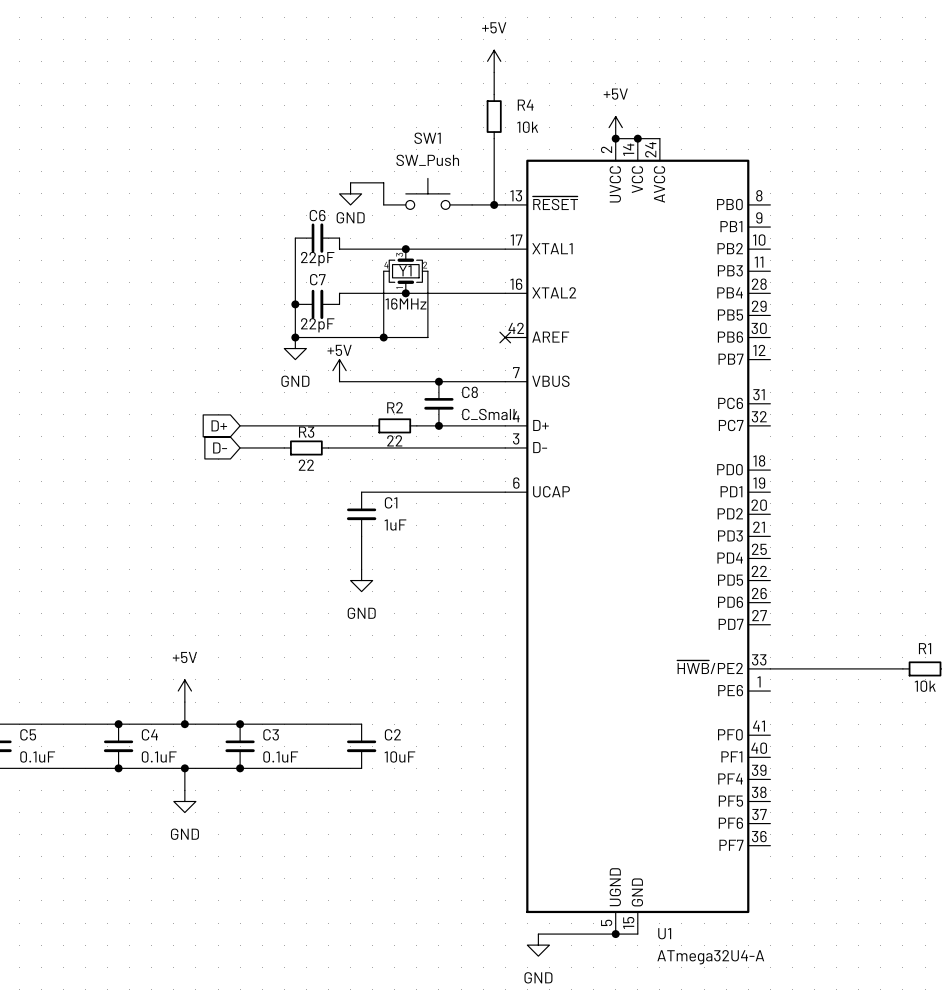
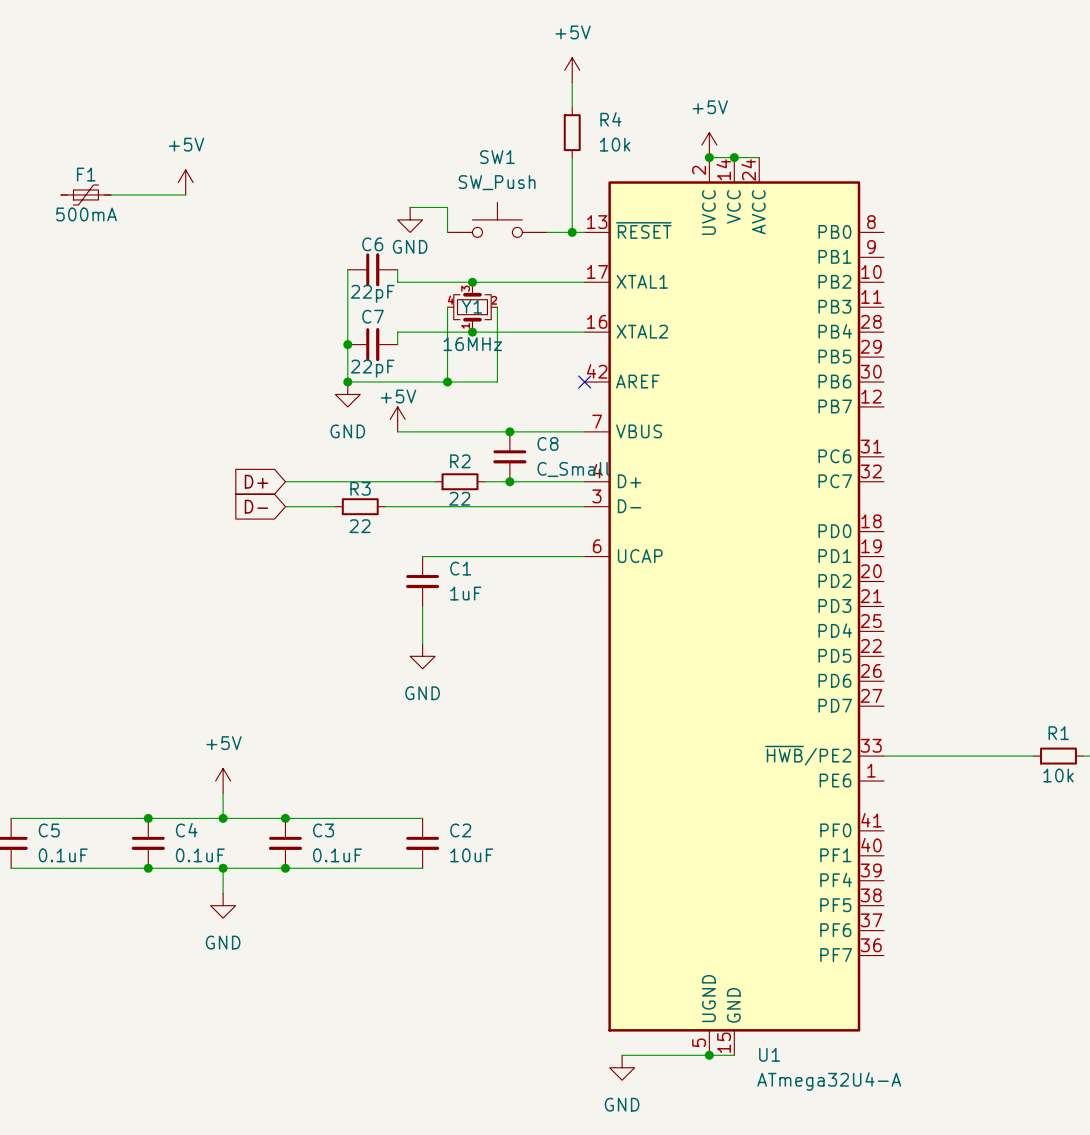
power symbol: none -> +5V (185, 182)
F1: none -> 500mA (85, 194)
wire: none -> (110, 194) (185, 194)

